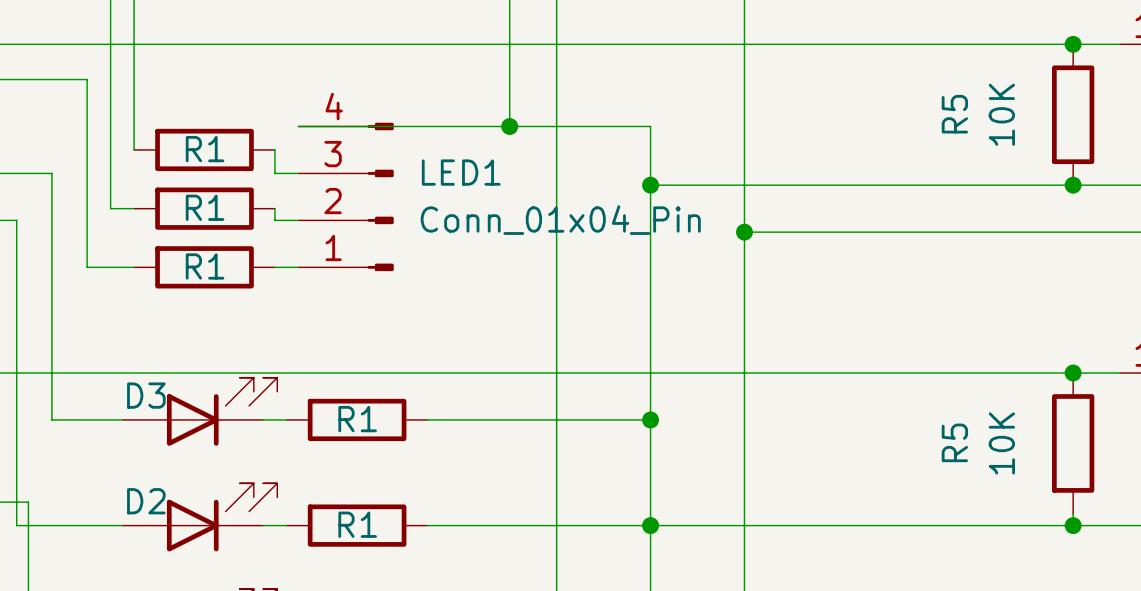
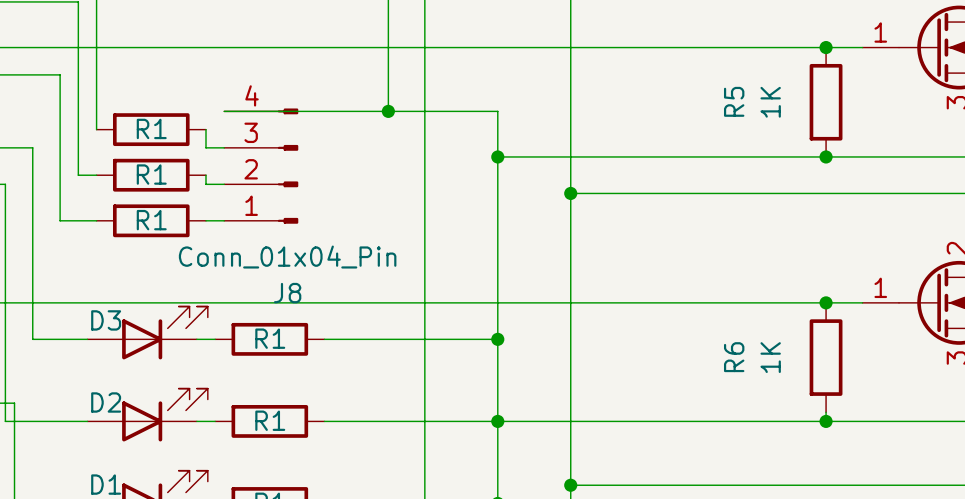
R5 value: 10K (1001, 114) -> 1K (770, 102)
LED1 name: LED1 (461, 172) -> J8 (287, 293)
LED1 value position: Conn_01x04_Pin (560, 220) -> Conn_01x04_Pin (287, 257)
R5 name: R5 (954, 442) -> R6 (734, 357)
R5 value: 10K (1001, 443) -> 1K (770, 357)

